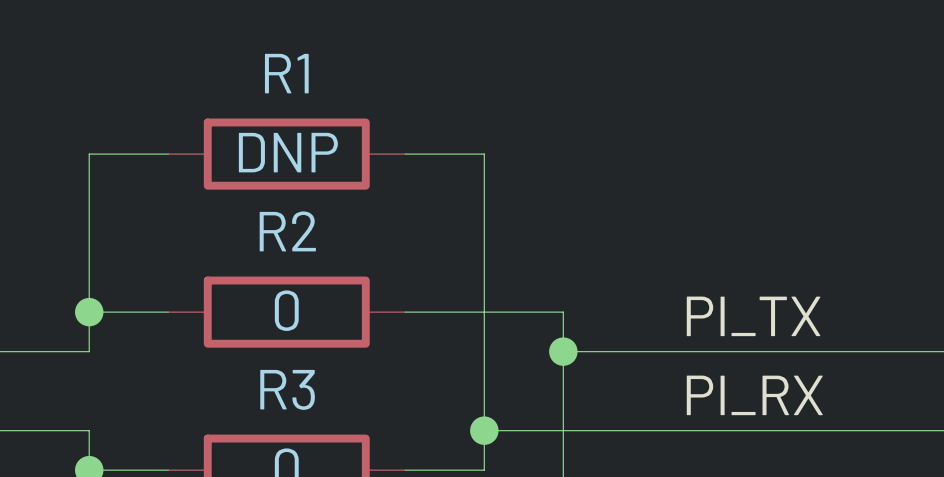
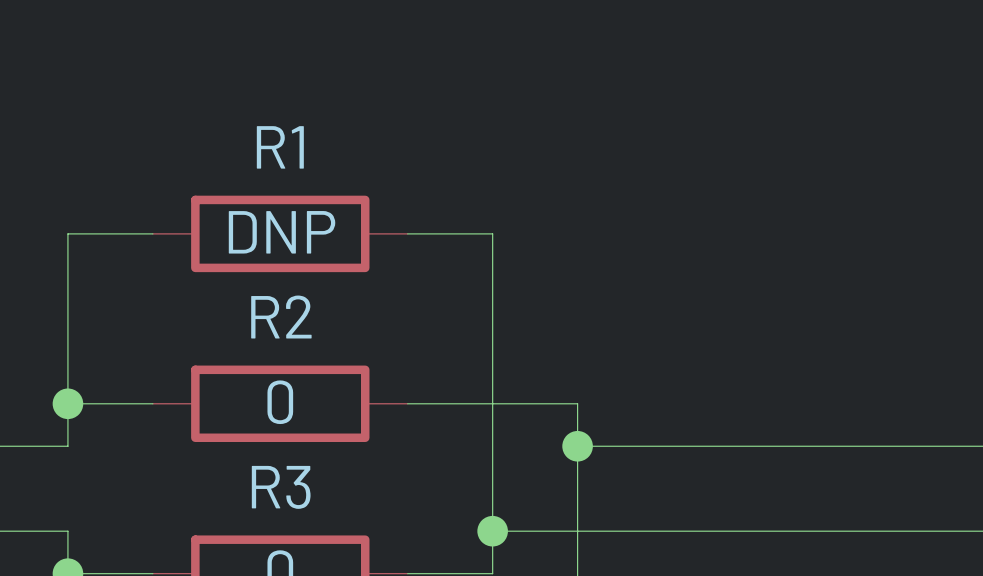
label: PI_TX (753, 316) -> none
label: PI_RX (754, 395) -> none

